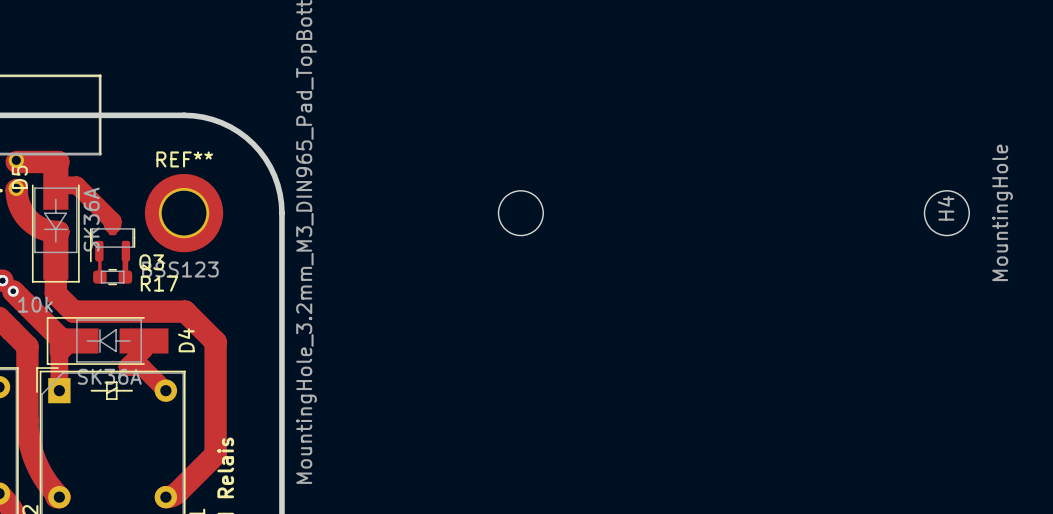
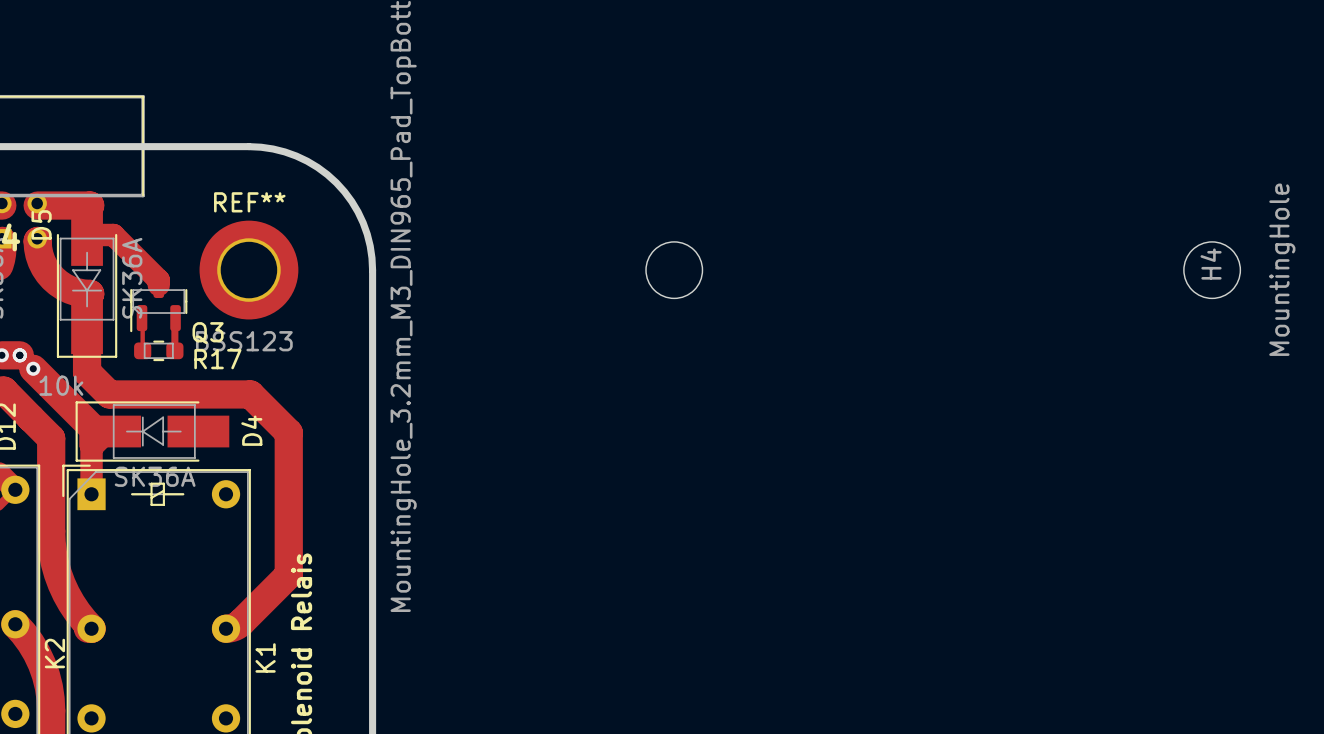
track: (144, 340) (144, 350) (127, 366) (142, 367) (165, 390) -> none

